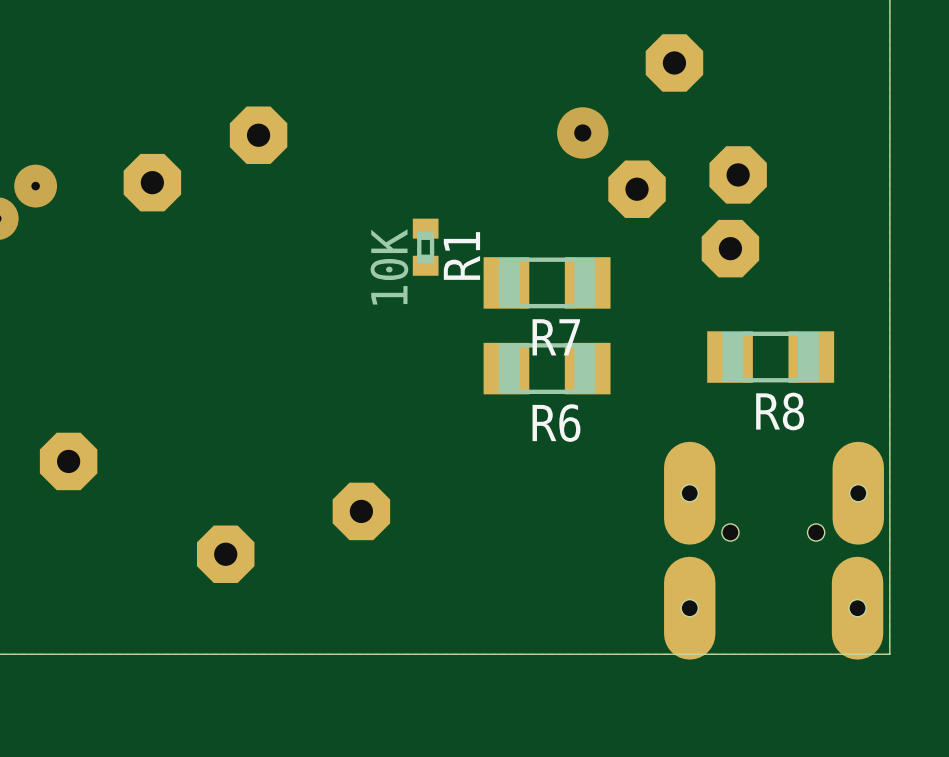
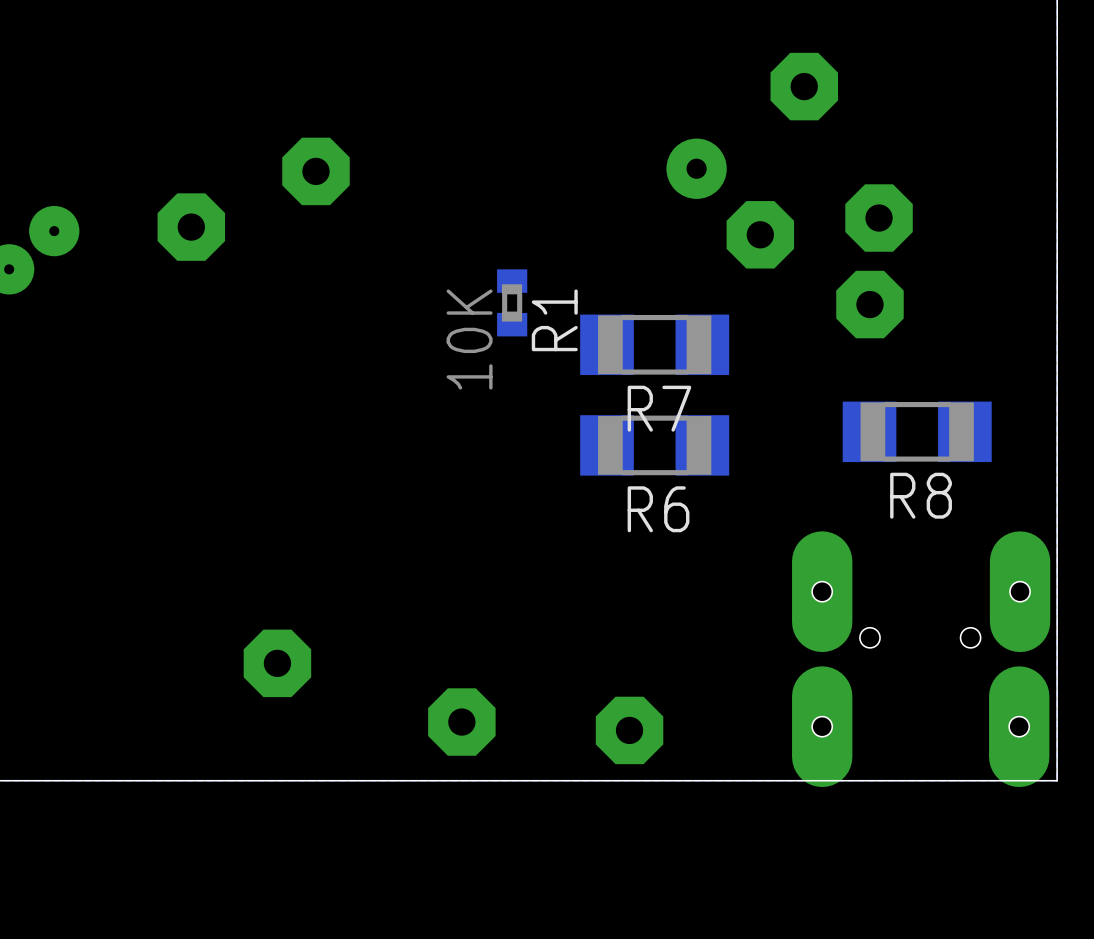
part: (68, 461) -> none
part position: (361, 511) -> (461, 722)
part: none -> (629, 730)

